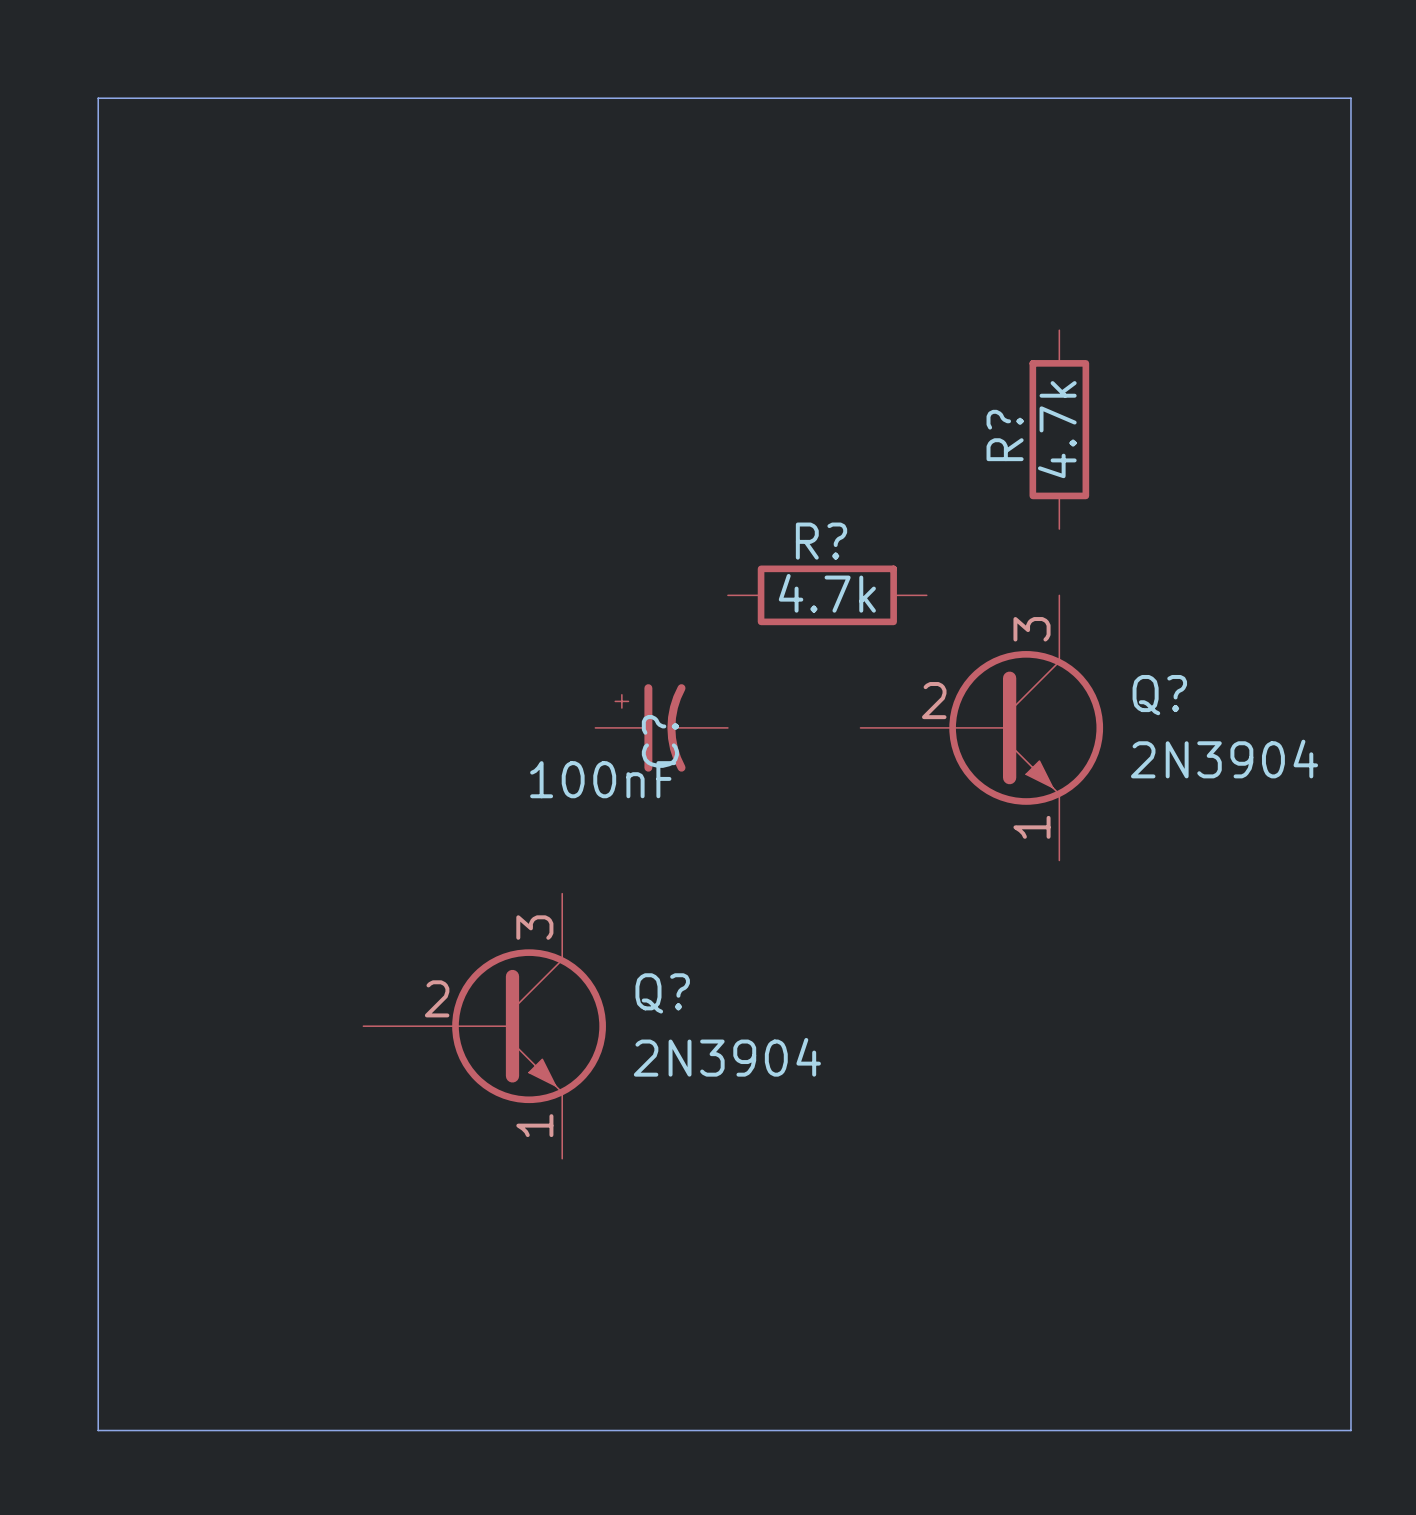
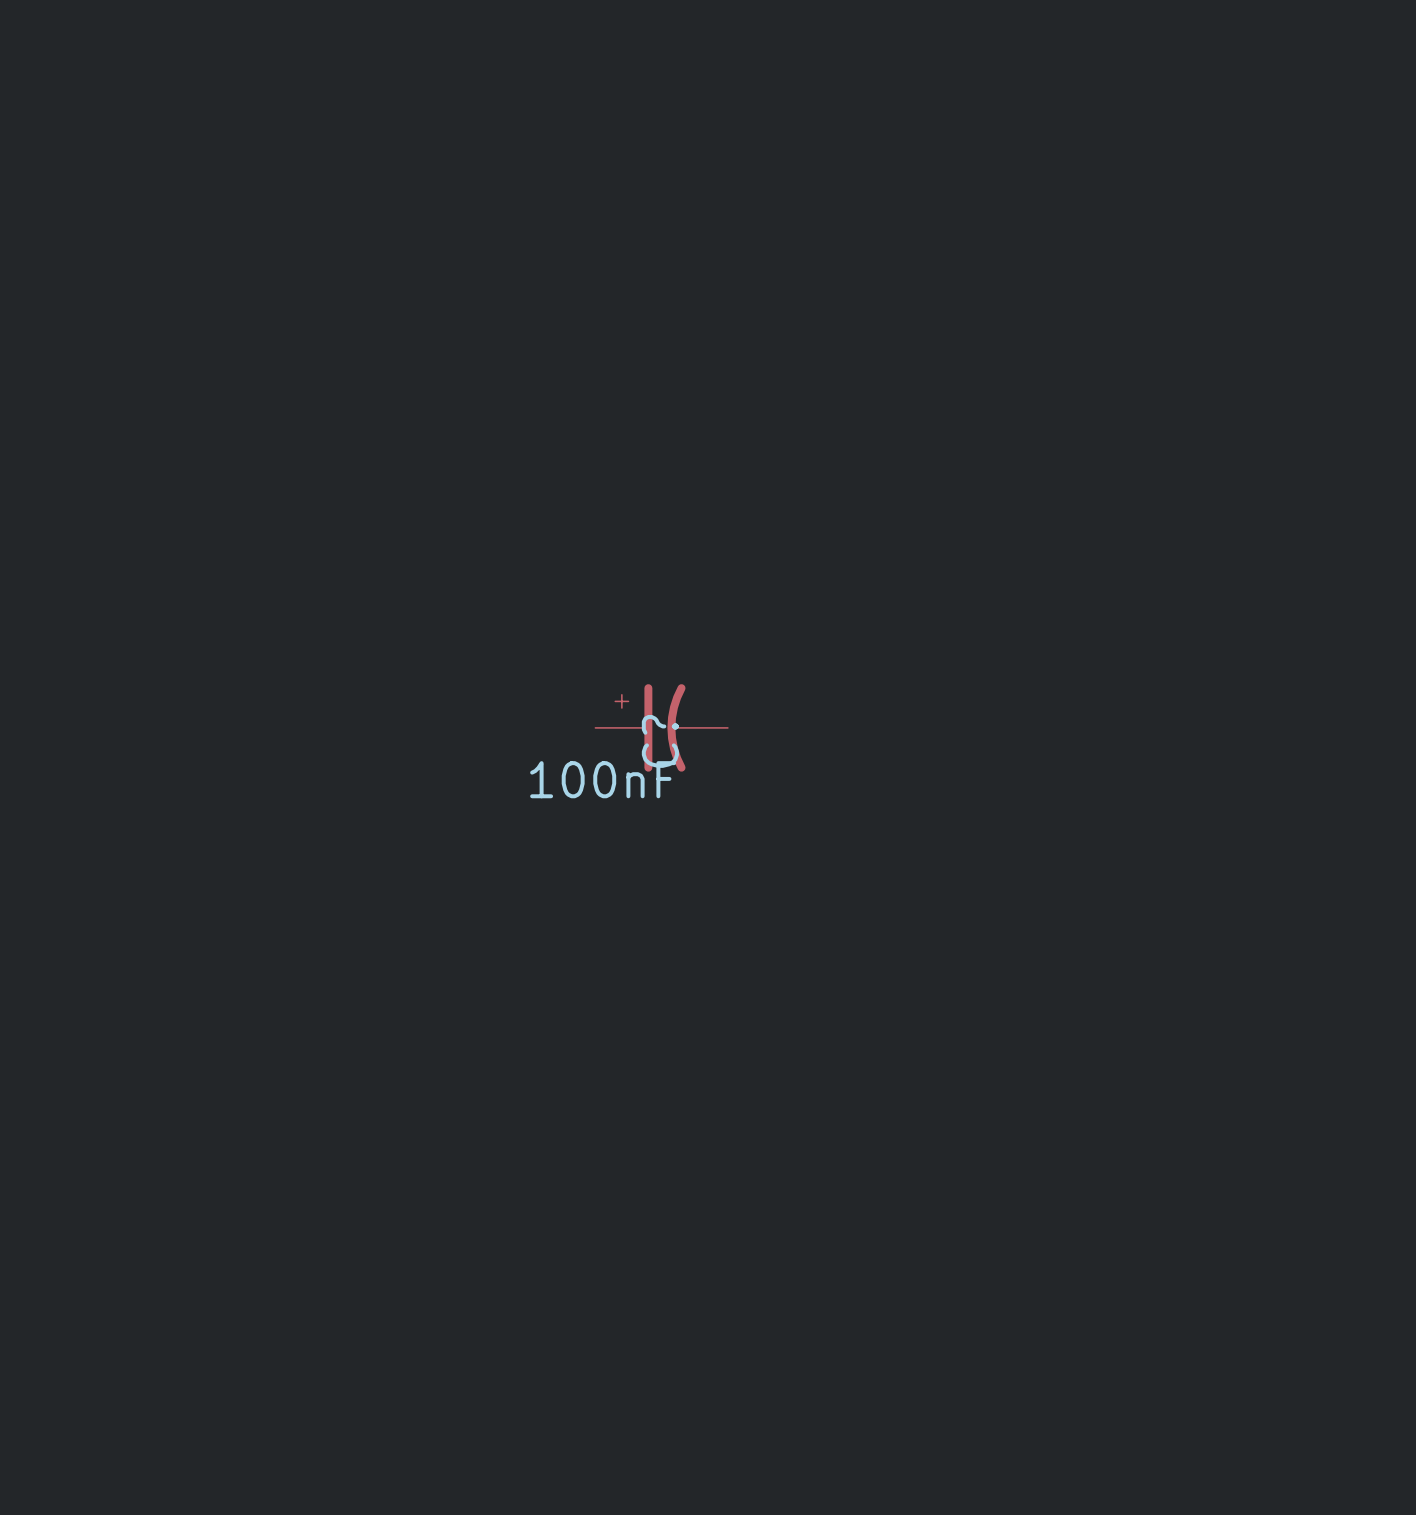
line: (98, 98) (1350, 98) (1350, 1430) (98, 1430) (98, 98) -> none
R?: 4.7k (1059, 429) -> none
R?: 4.7k (827, 595) -> none
Q?: 2N3904 (981, 727) -> none
Q?: 2N3904 (484, 1026) -> none

